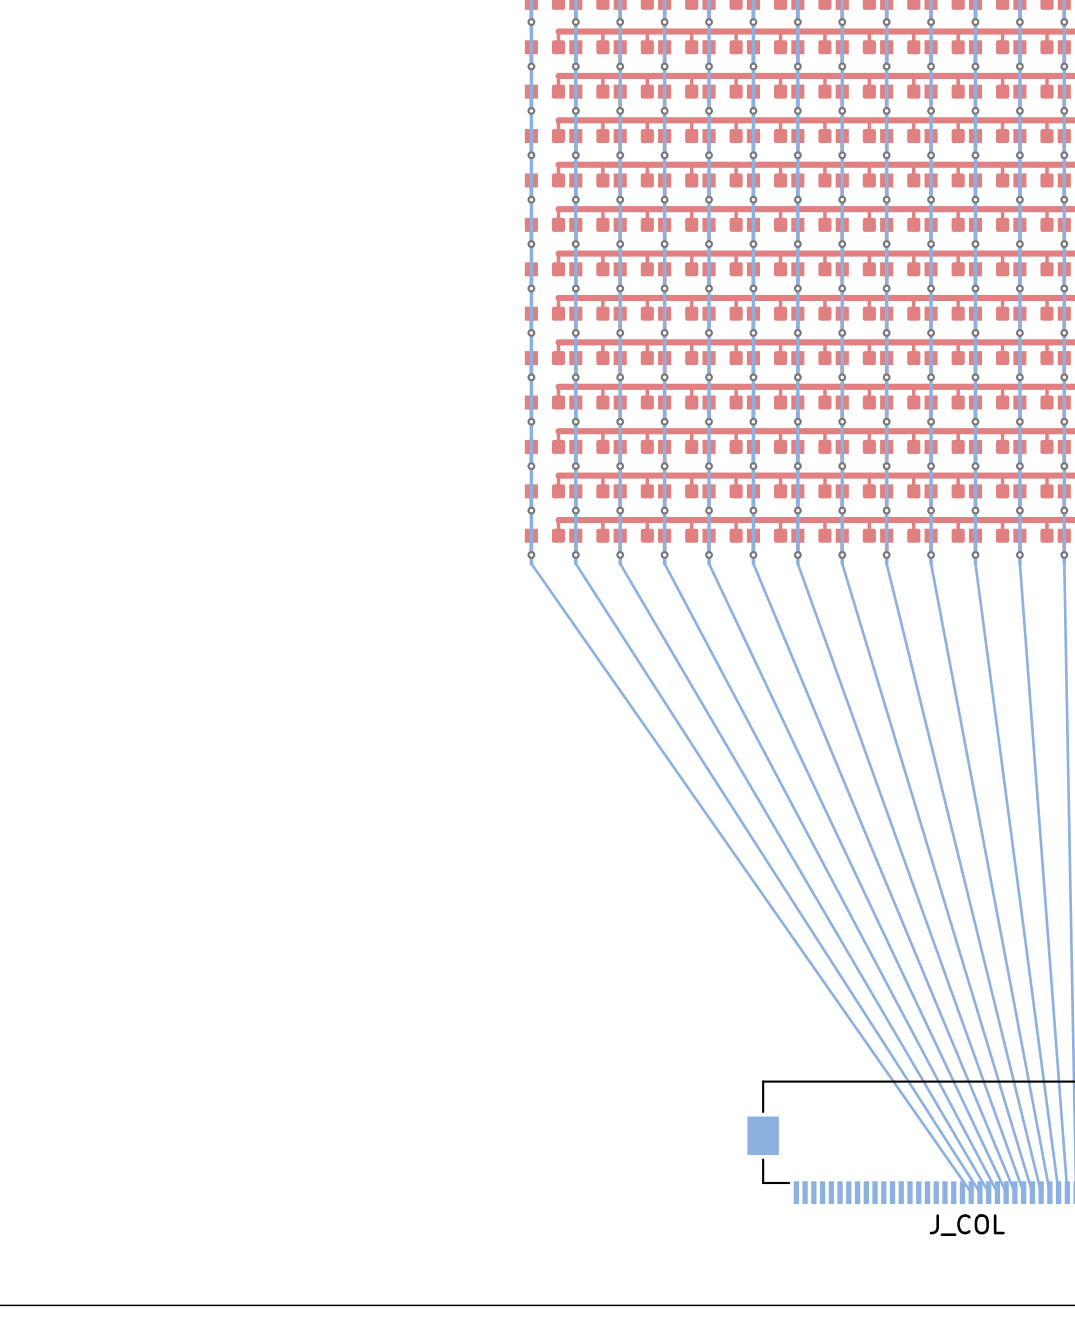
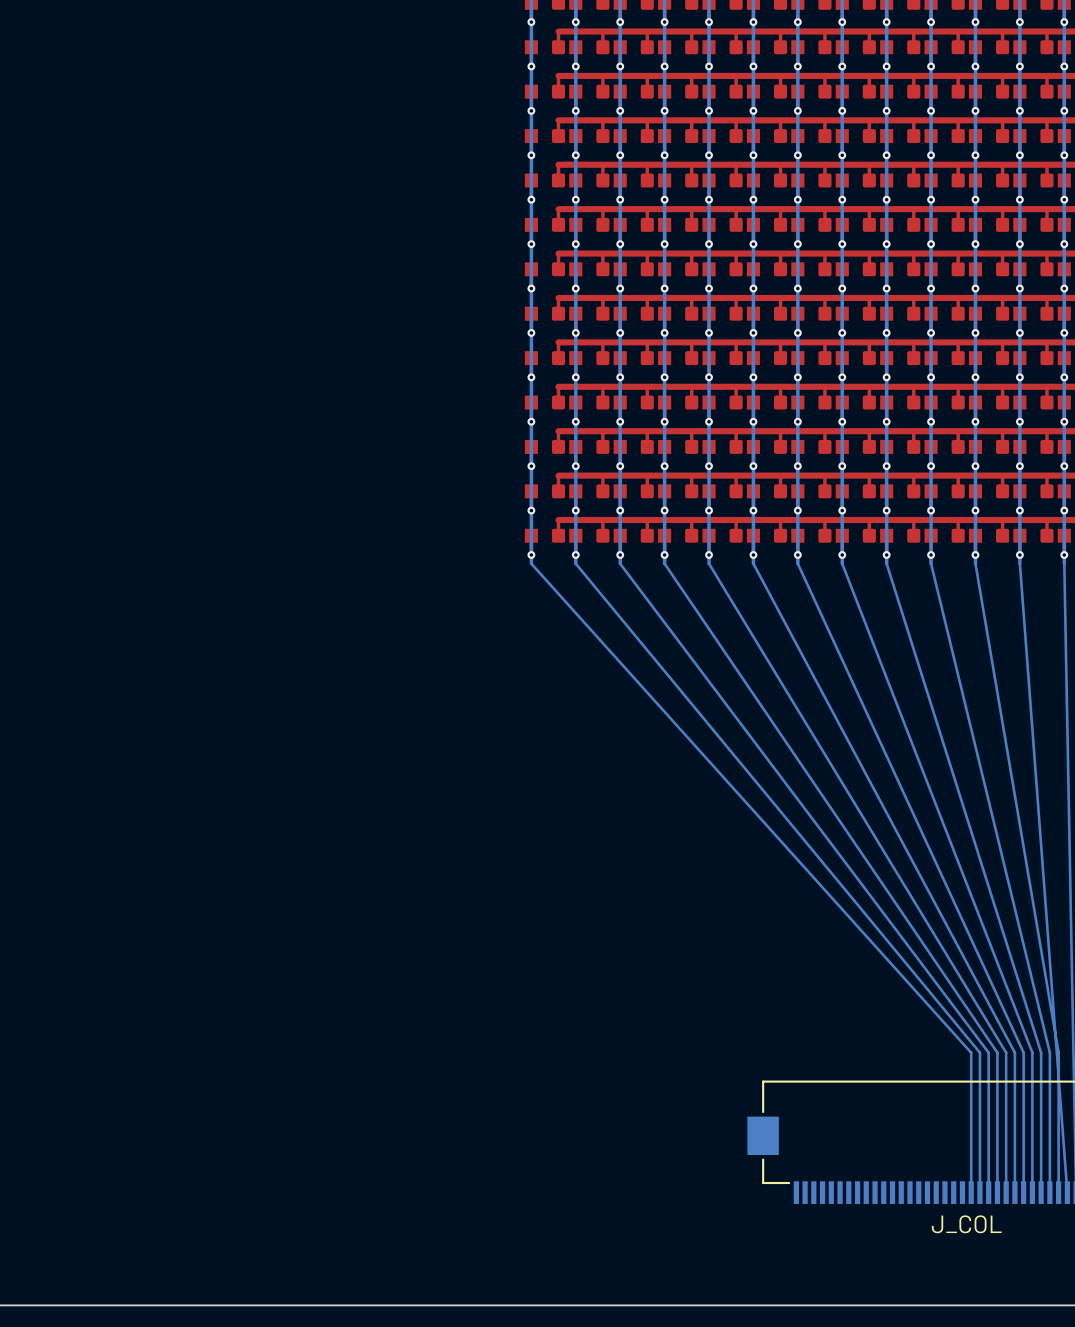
bottom track: (531, 563) (971, 1192) -> (531, 563) (971, 1052) (971, 1192)
bottom track: (575, 563) (979, 1192) -> (575, 563) (979, 1052) (979, 1192)
bottom track: (620, 563) (988, 1192) -> (620, 563) (988, 1052) (988, 1192)
bottom track: (664, 563) (997, 1192) -> (664, 563) (997, 1052) (997, 1192)
bottom track: (709, 563) (1006, 1192) -> (709, 563) (1006, 1052) (1006, 1192)
bottom track: (753, 563) (1014, 1192) -> (753, 563) (1014, 1052) (1014, 1192)
bottom track: (797, 563) (1023, 1192) -> (797, 563) (1023, 1052) (1023, 1192)
bottom track: (842, 563) (1032, 1192) -> (842, 563) (1032, 1052) (1032, 1192)
bottom track: (886, 563) (1041, 1192) -> (886, 563) (1041, 1052) (1041, 1192)
bottom track: (931, 563) (1049, 1192) -> (931, 563) (1049, 1052) (1049, 1192)
bottom track: (975, 563) (1058, 1192) -> (975, 563) (1058, 1052) (1058, 1192)

